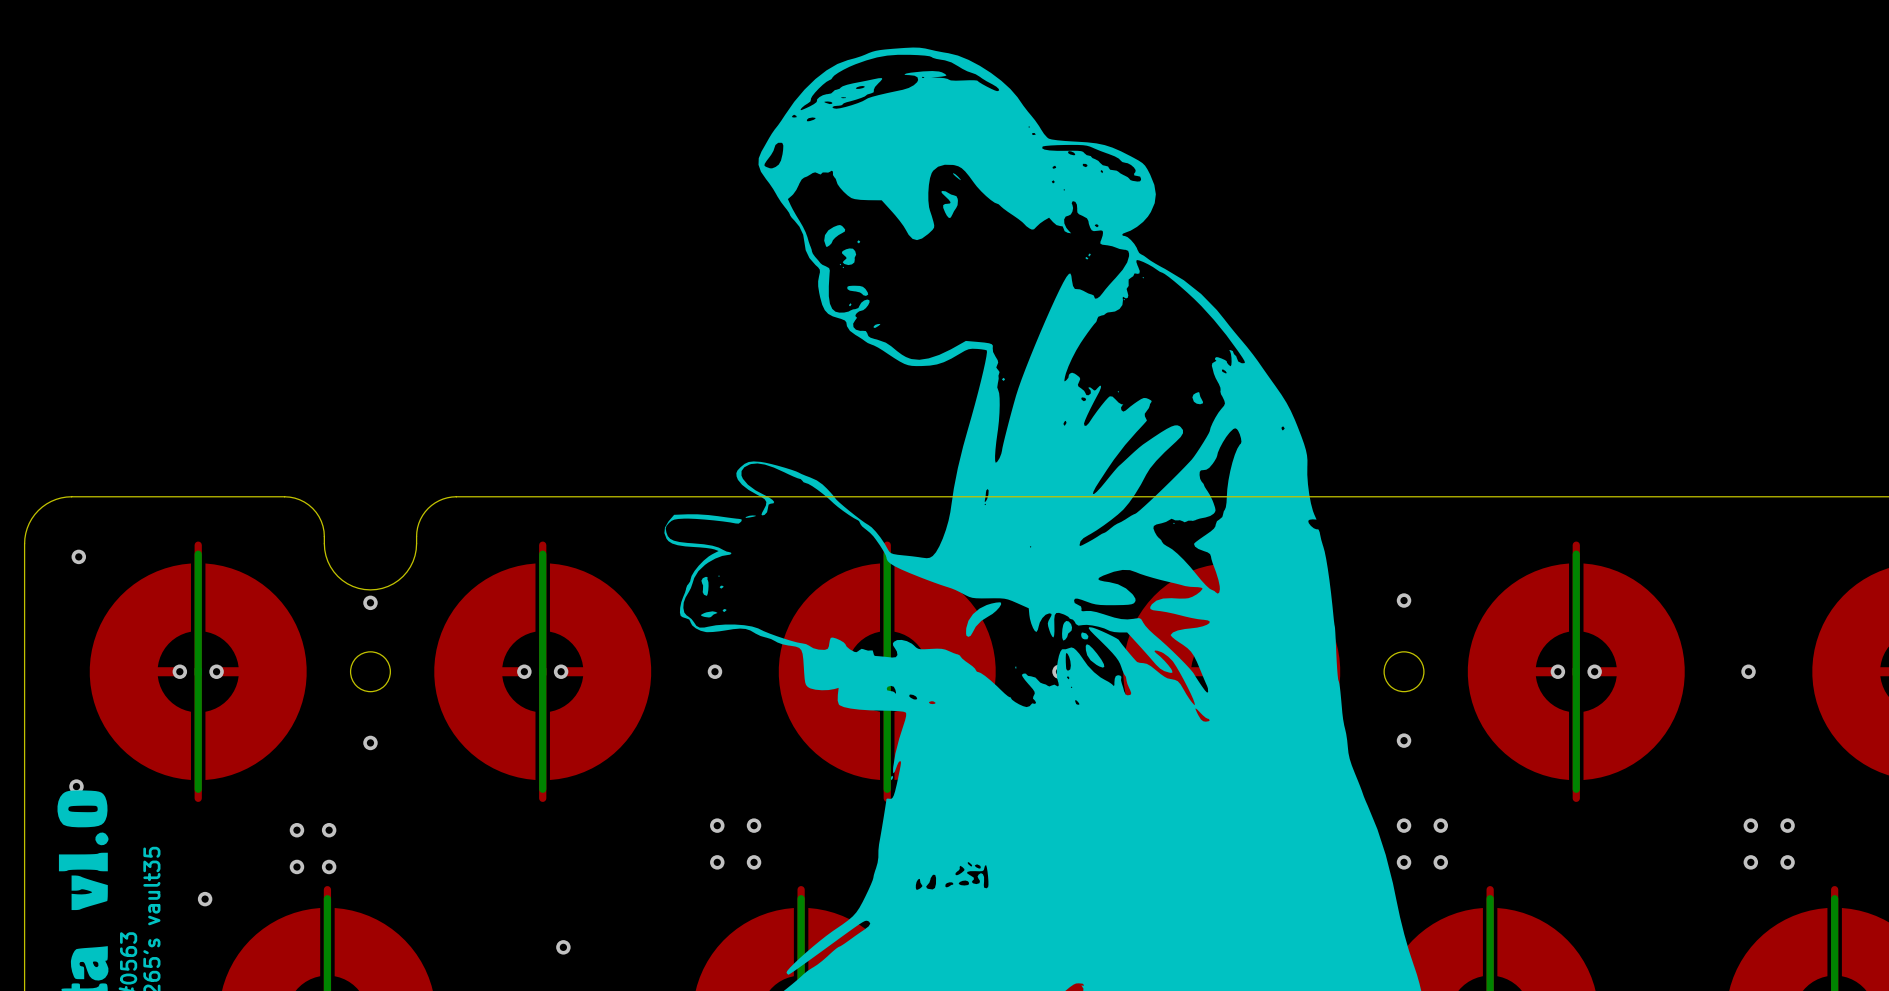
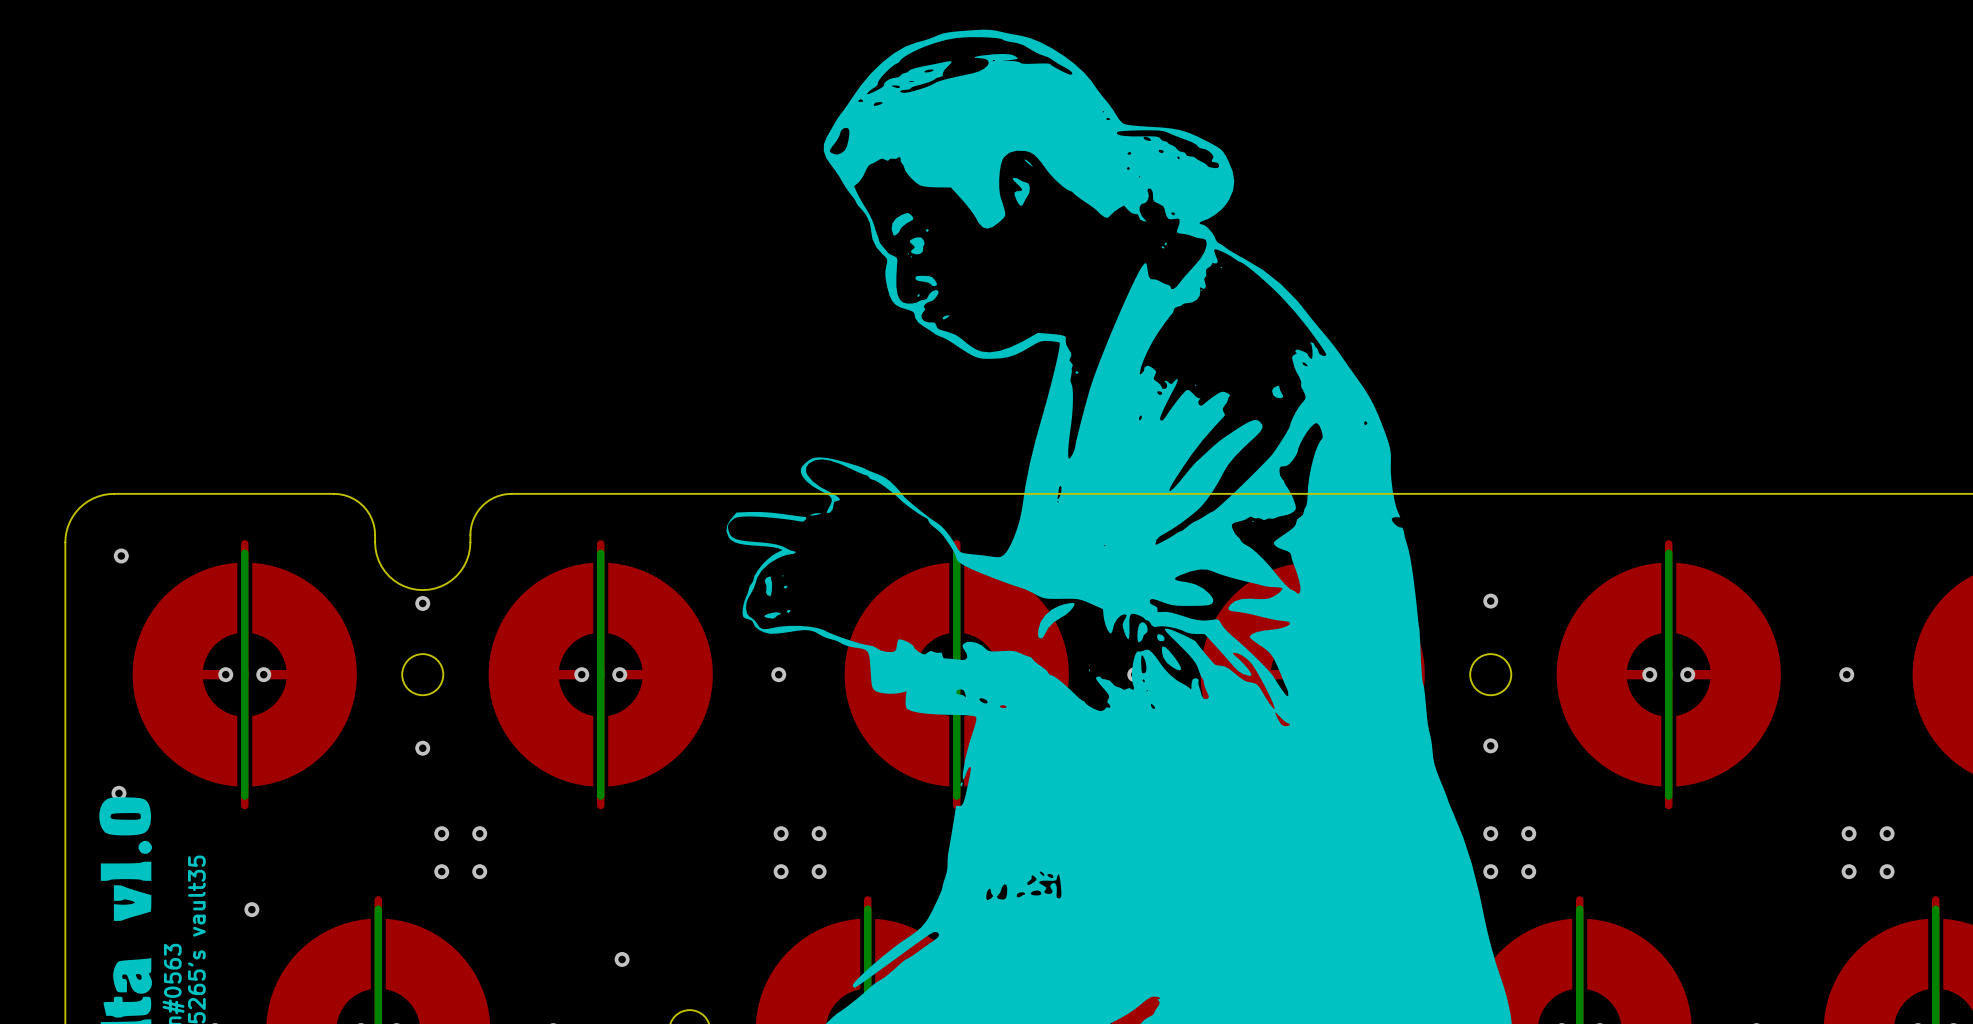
via: none -> (441, 833)
via: none -> (479, 833)
via: (296, 830) -> none
via: (329, 830) -> none
via: none -> (441, 871)
via: none -> (479, 871)
via: (296, 866) -> none
via: (329, 866) -> none

